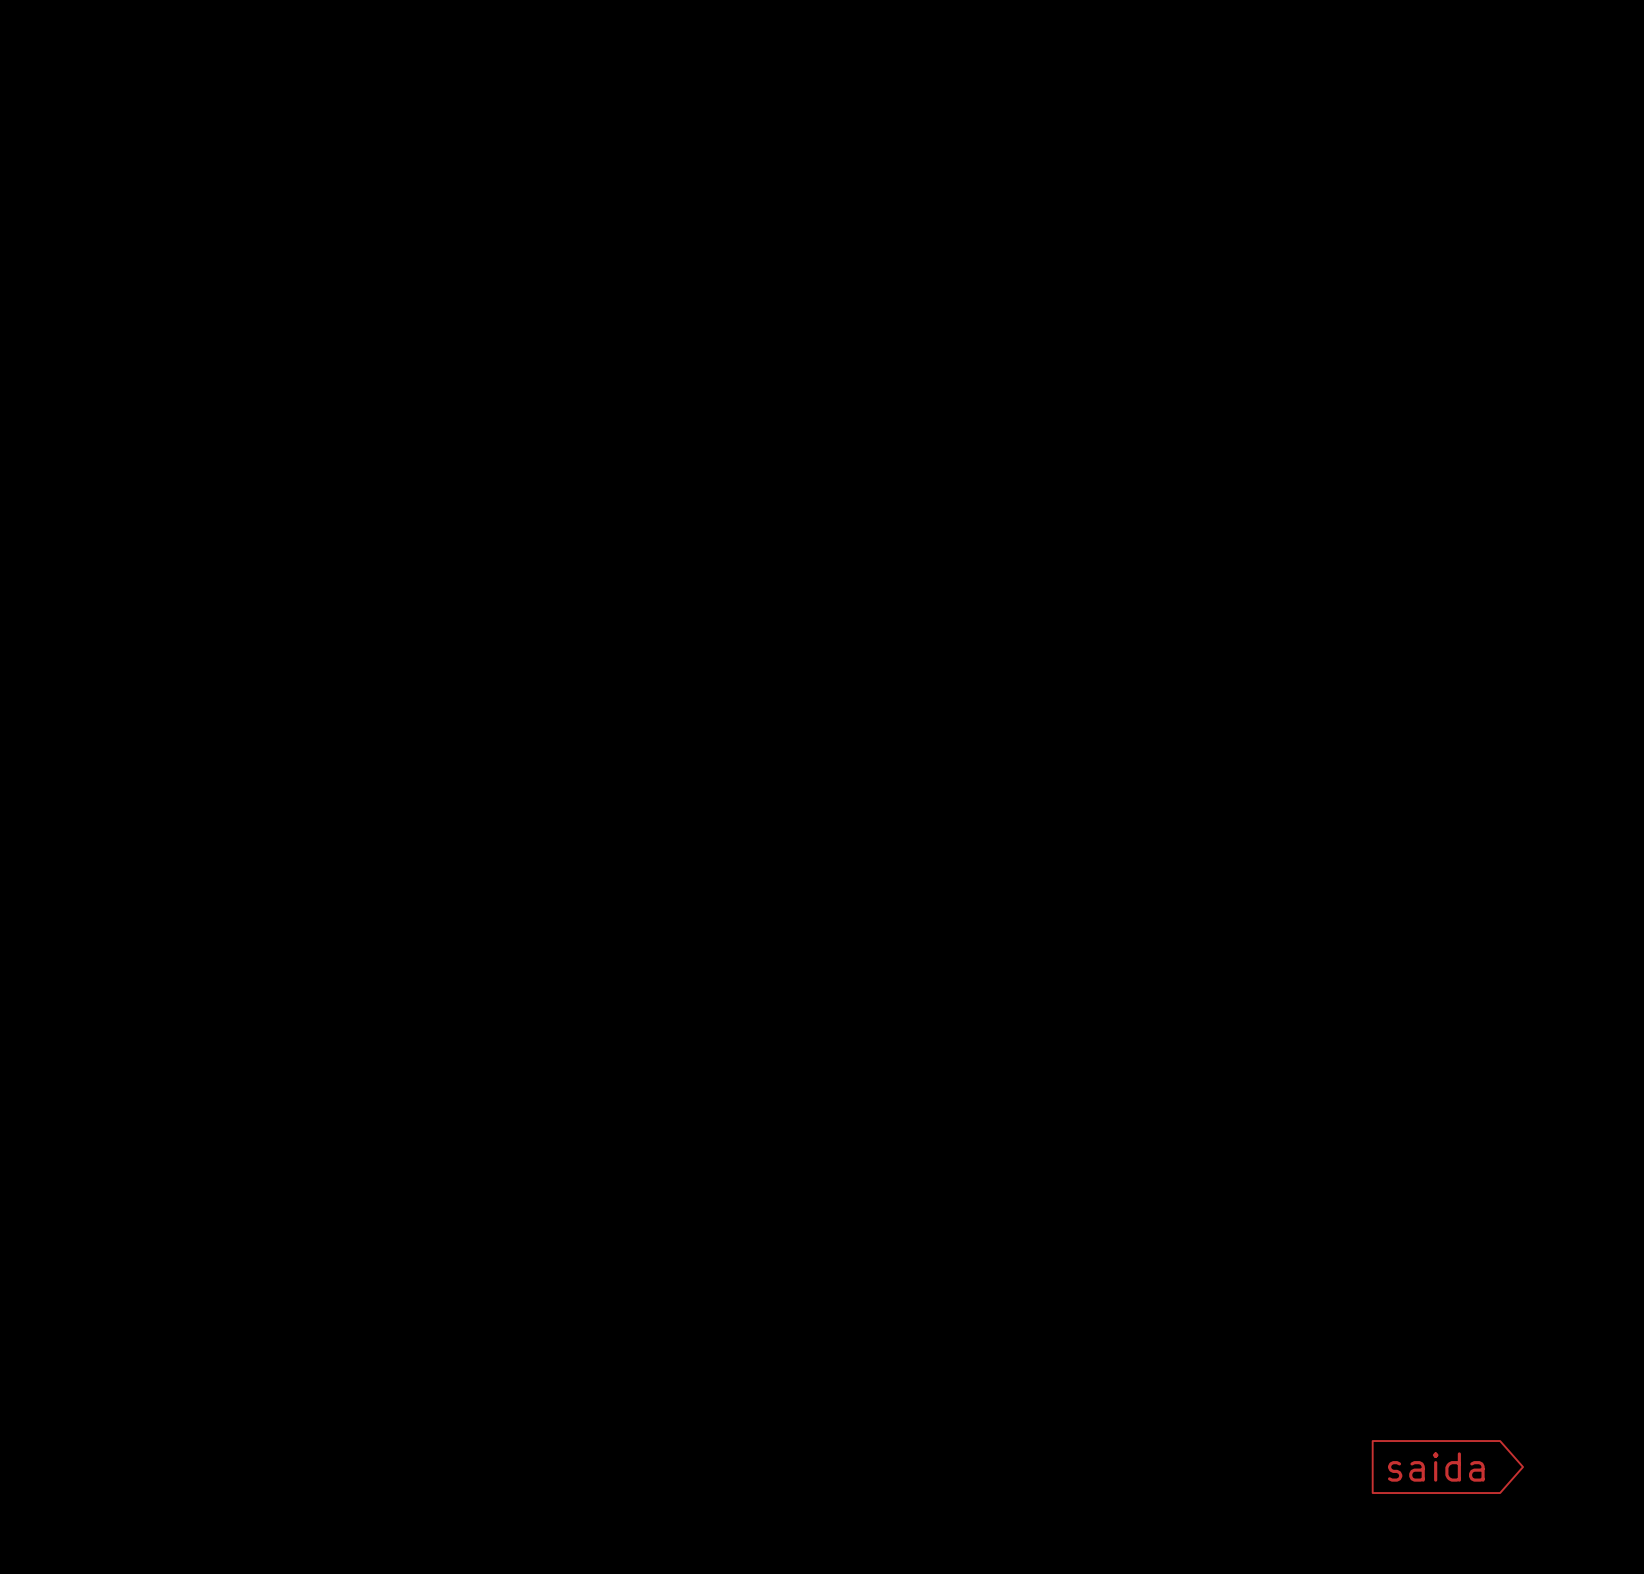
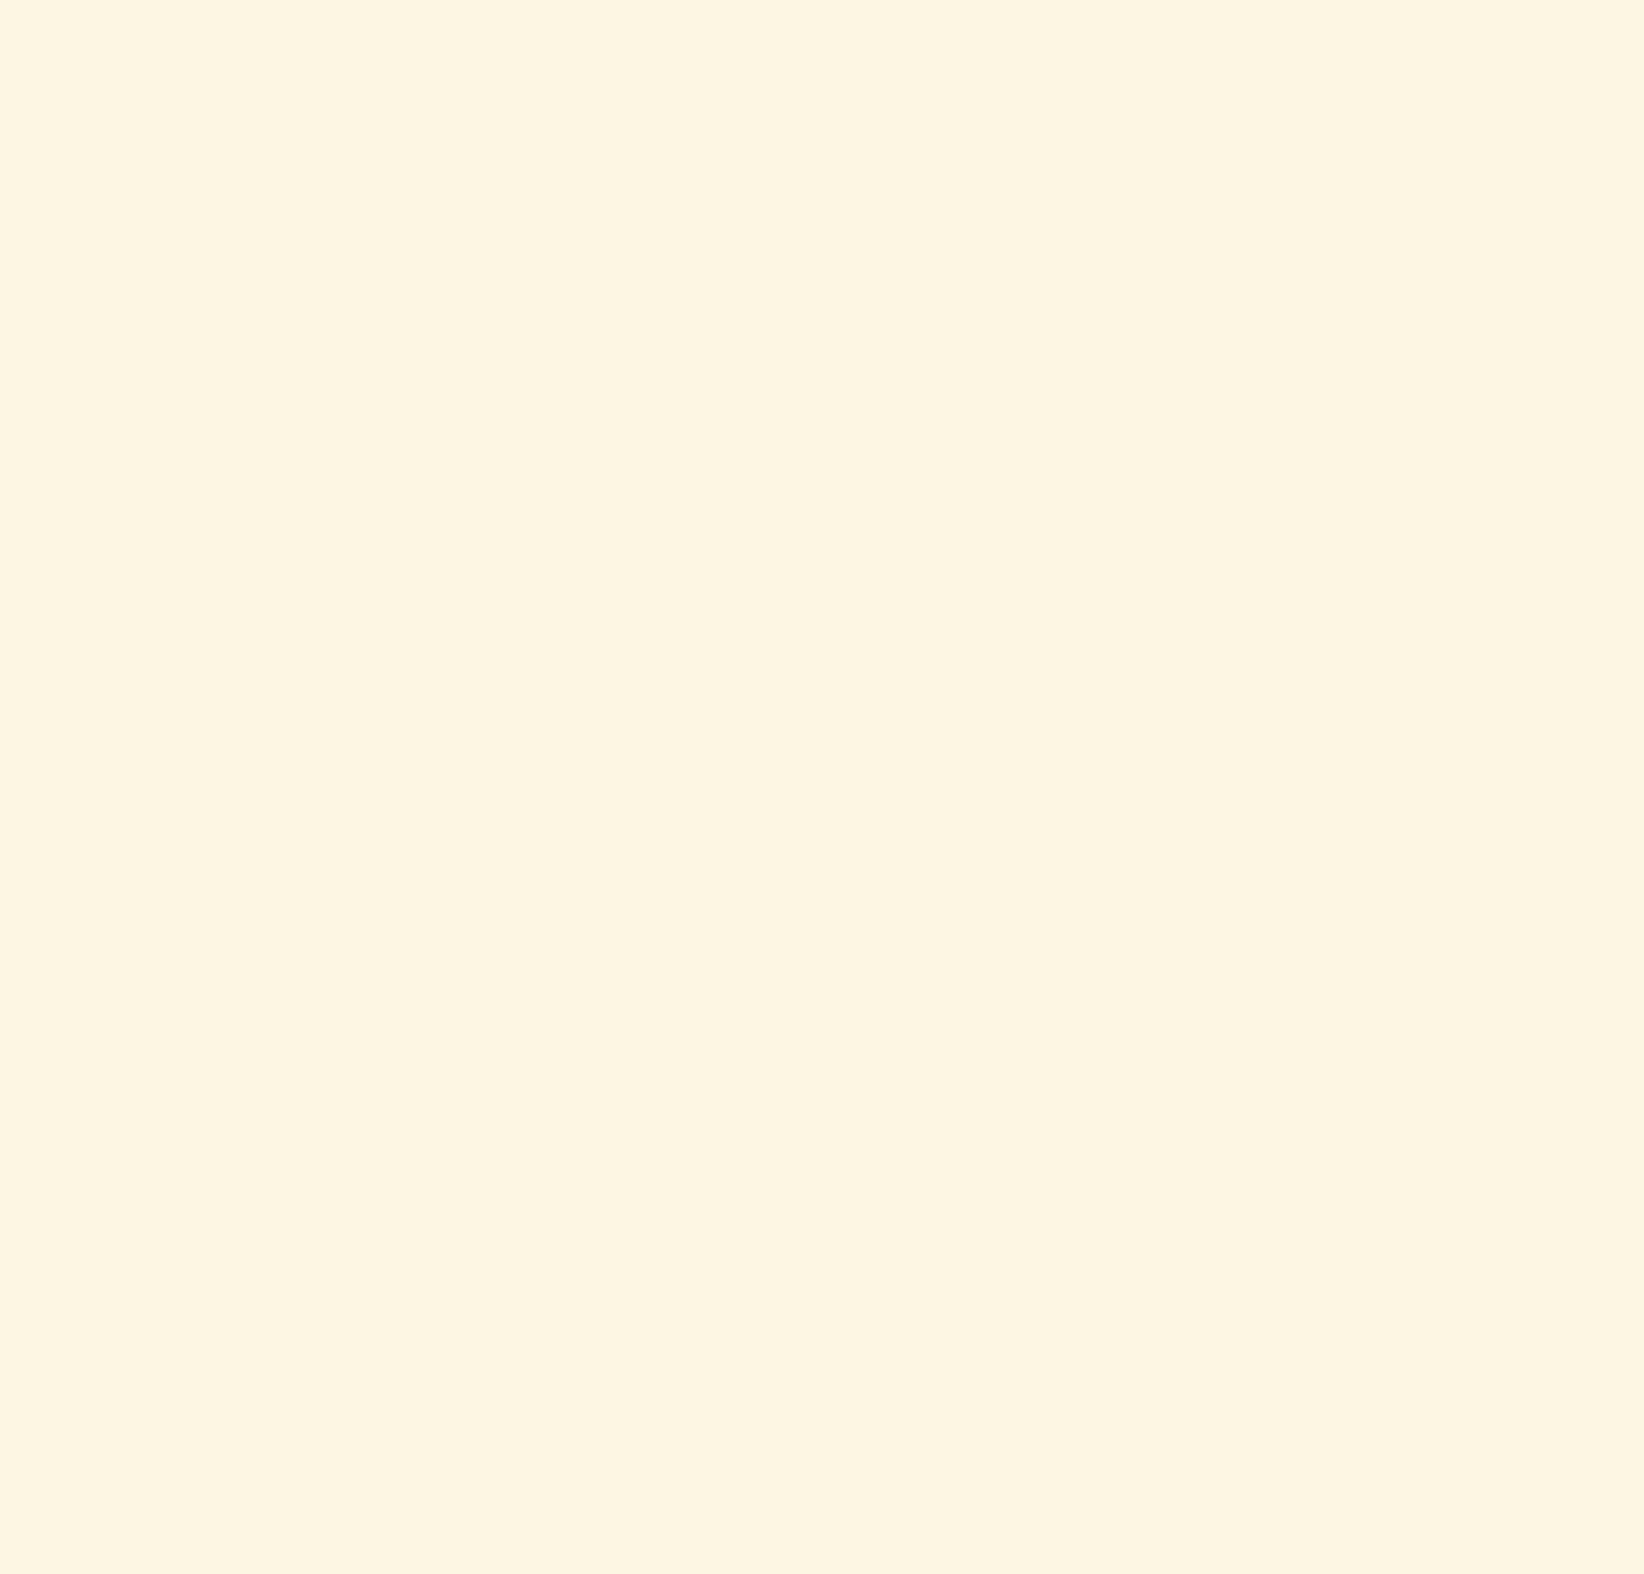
global label: saida (1436, 1467) -> none

